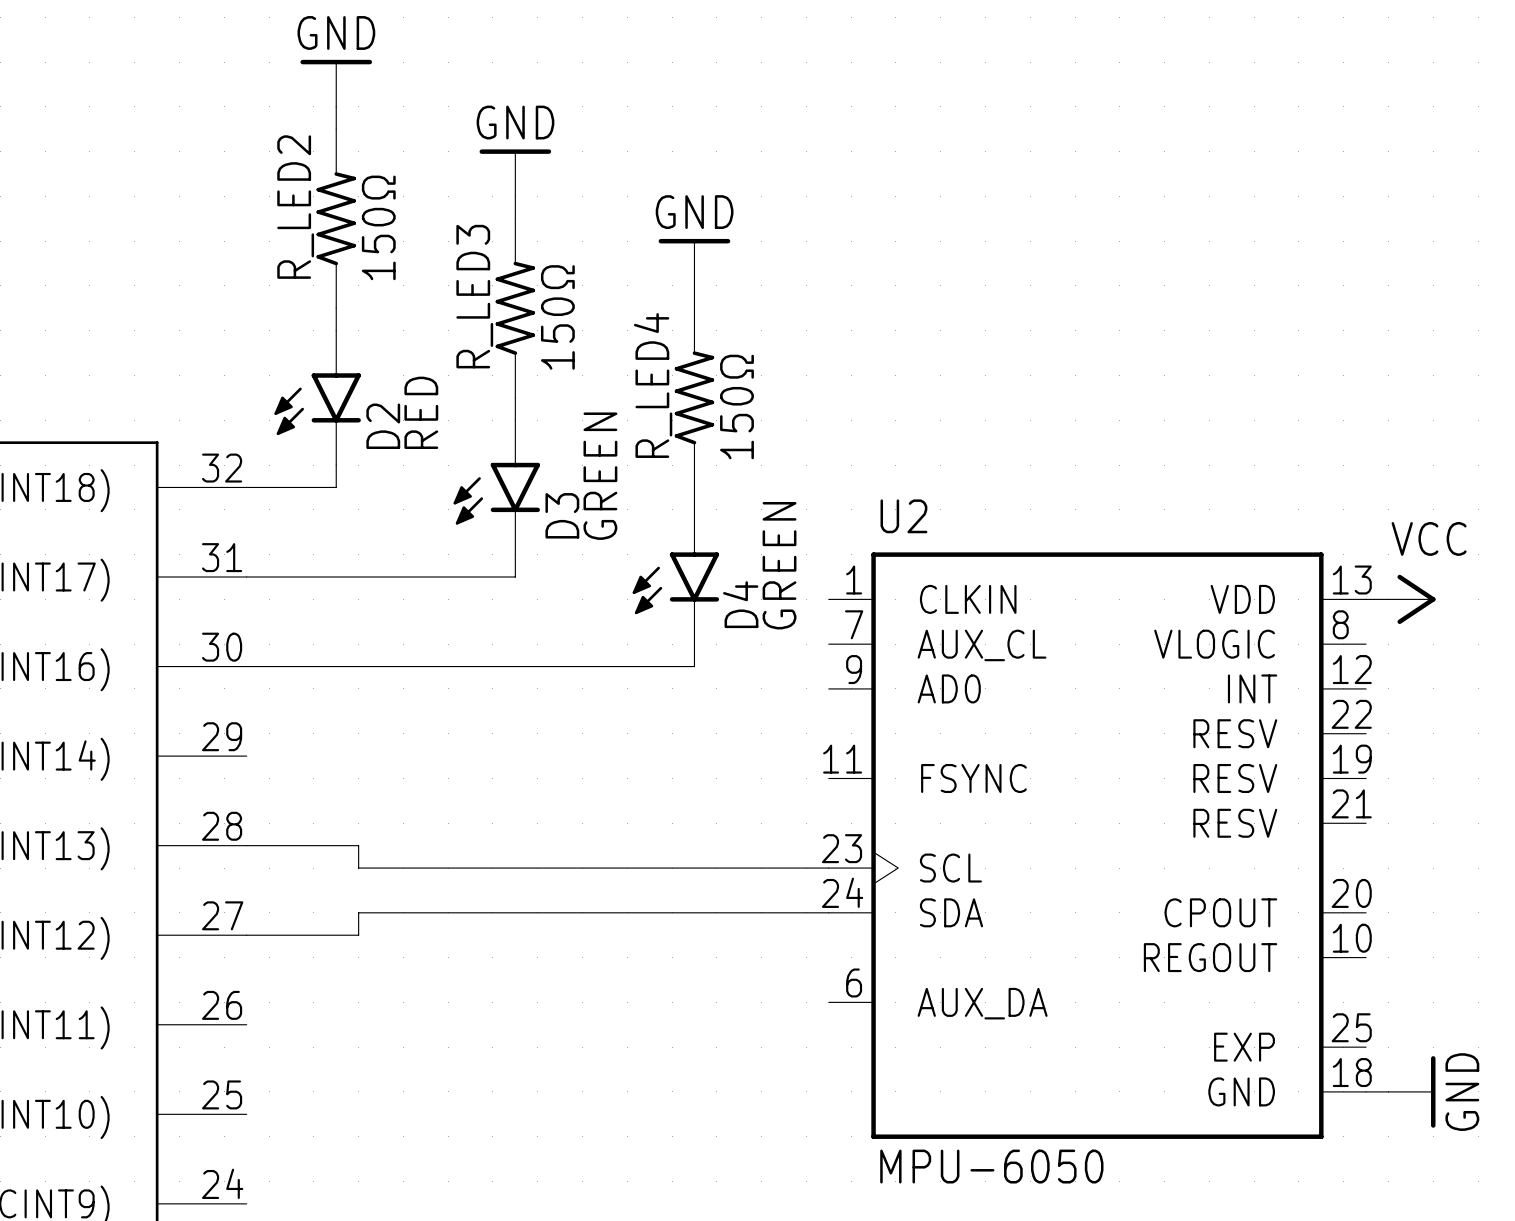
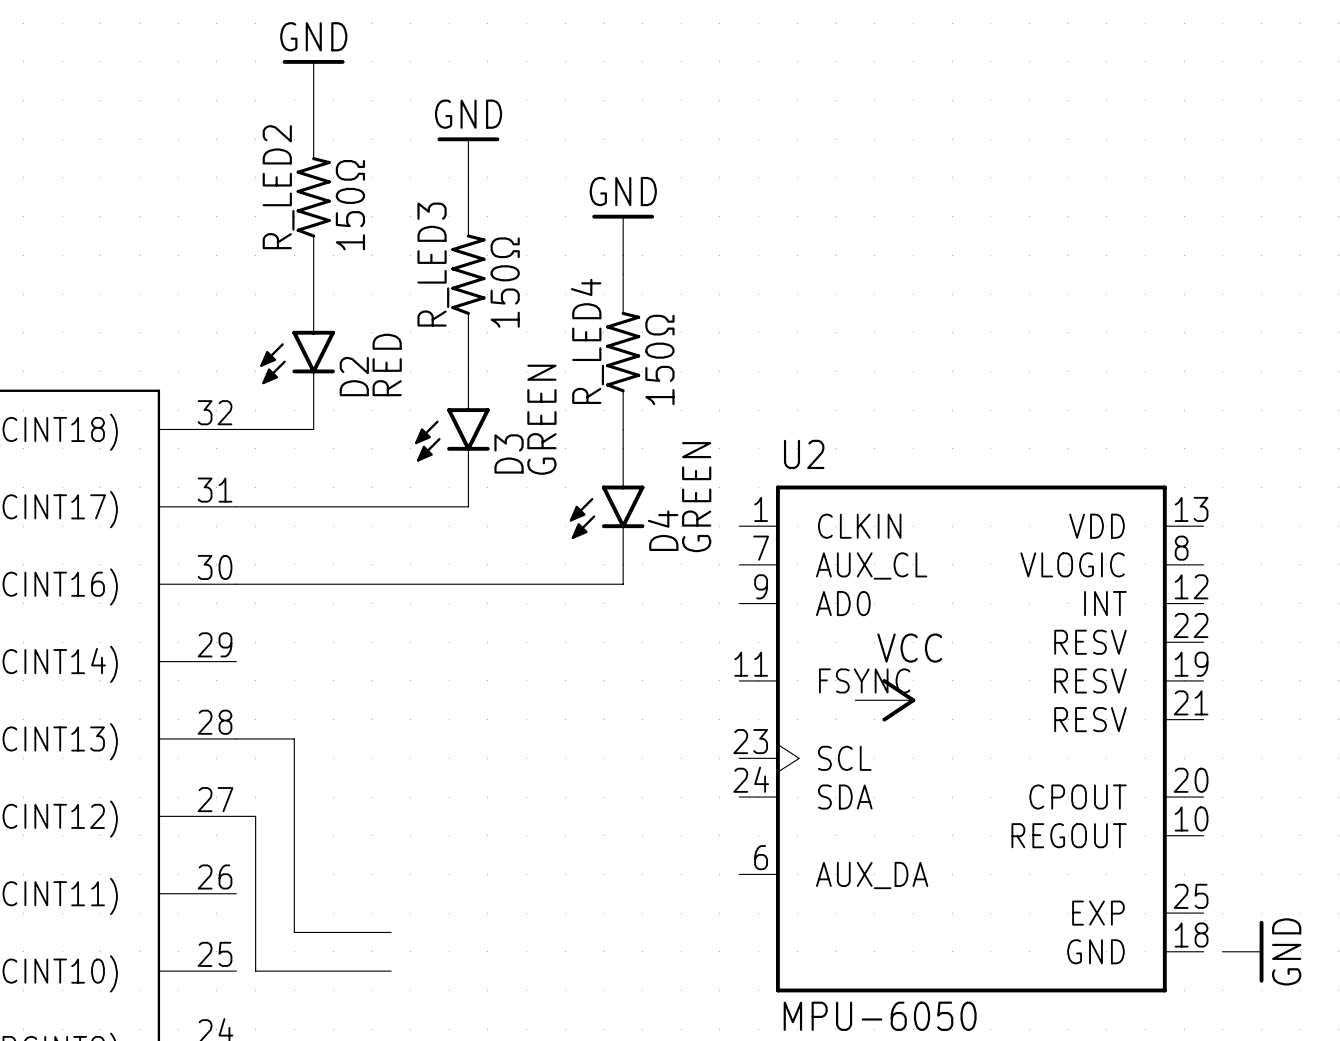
wire: (1366, 599) (1388, 599) -> none
power symbol: VCC (1411, 599) -> none
wire: none -> (855, 700) (874, 700)
power symbol: none -> VCC (894, 700)
wire: (313, 845) (358, 845) (358, 868) (828, 868) -> (294, 738) (294, 932) (391, 932)
wire: (828, 912) (358, 912) (358, 935) (269, 935) -> (391, 971) (255, 971) (255, 816)
wire: (1366, 1091) (1388, 1091) -> none

